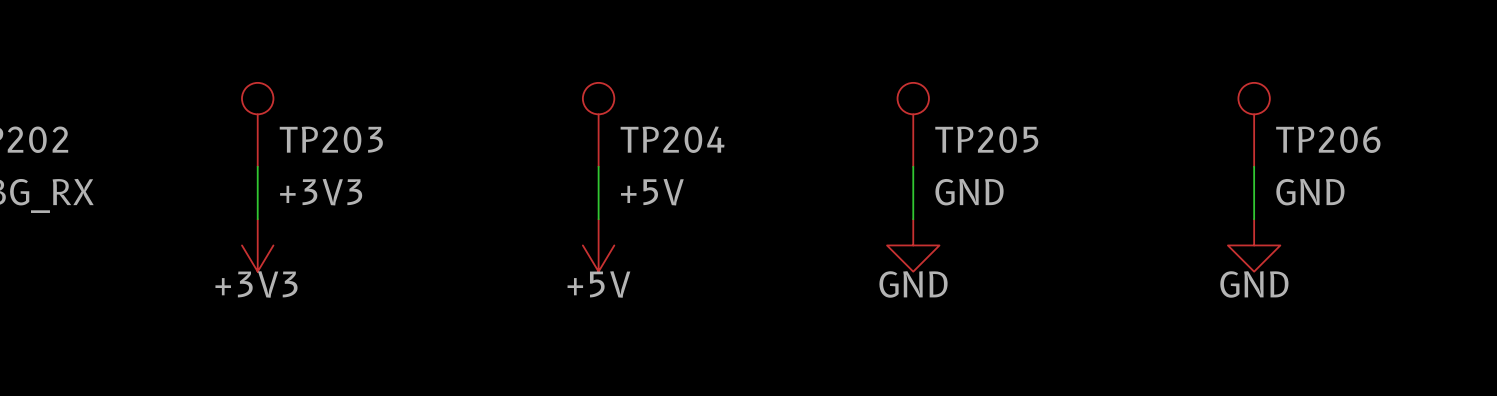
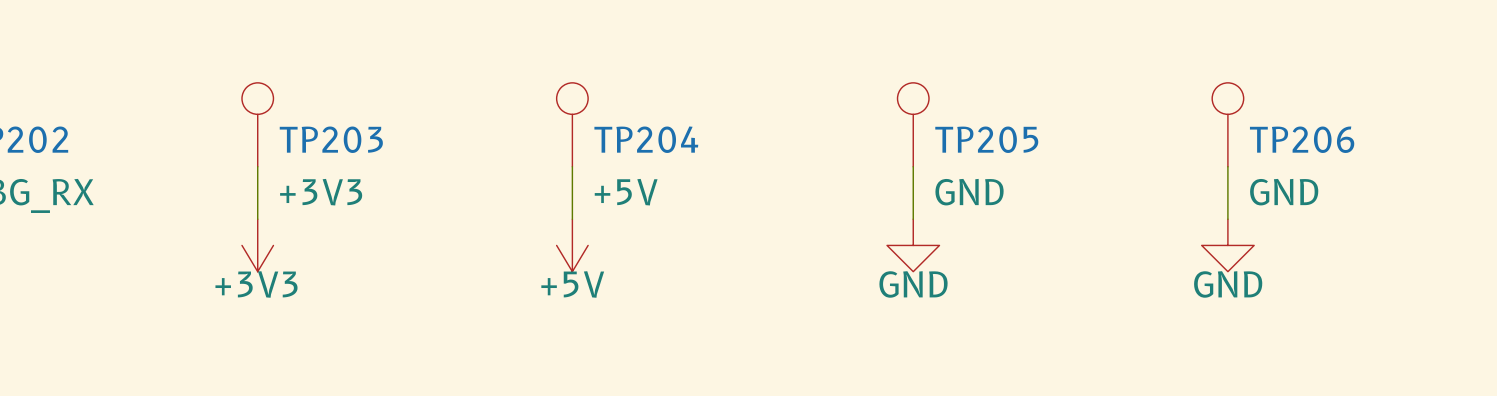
TP204 position: (598, 124) -> (572, 124)
TP206 position: (1254, 124) -> (1227, 124)
wire: (598, 166) (598, 219) -> (572, 166) (572, 219)
wire: (1254, 166) (1254, 219) -> (1227, 166) (1227, 219)
power symbol position: +5V (598, 245) -> +5V (572, 245)
power symbol position: GND (1254, 245) -> GND (1227, 245)

